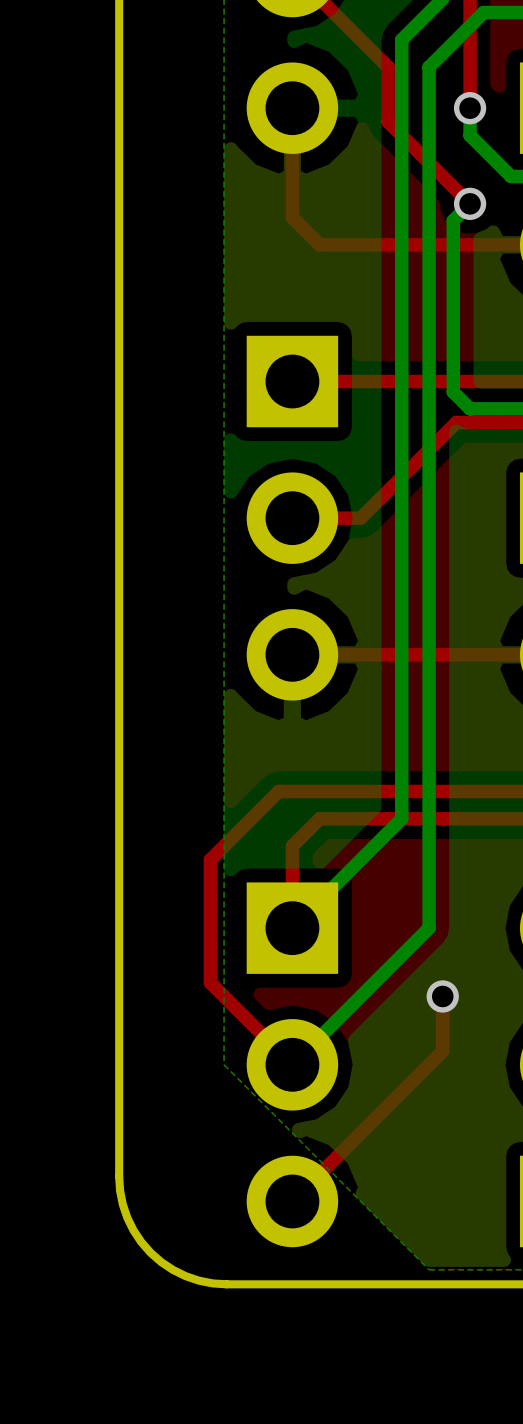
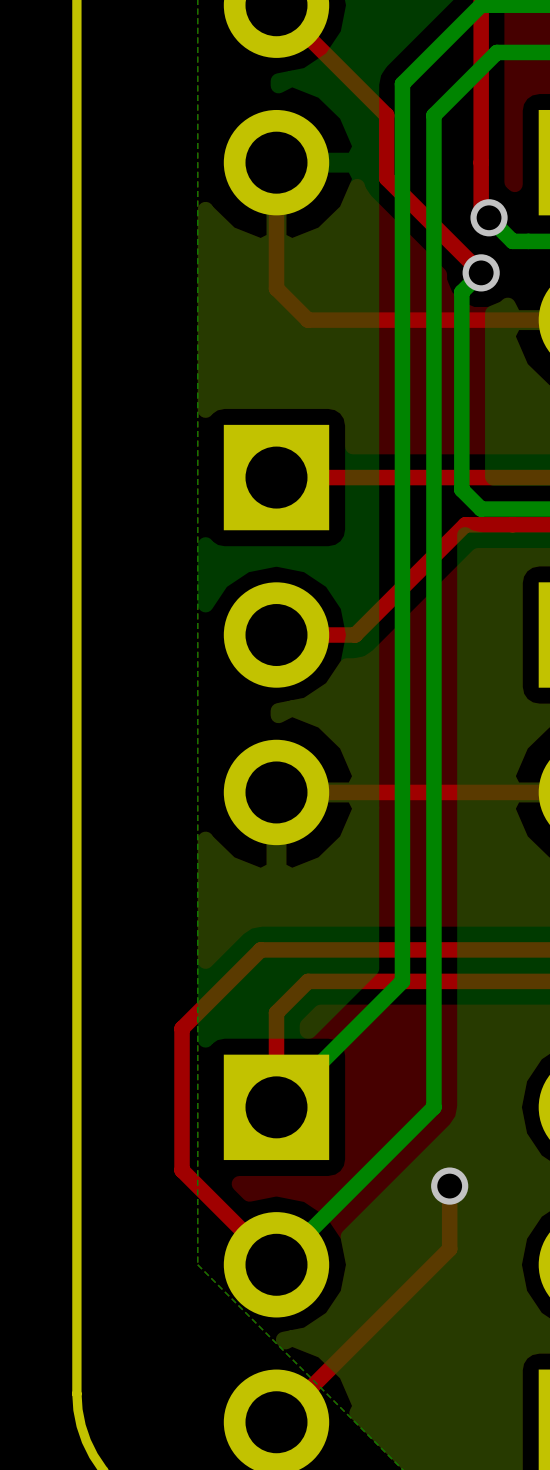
top track: none -> (481, 162) (481, 209) (489, 217)
bottom track: (470, 108) (470, 135) (511, 176) -> (489, 217) (512, 241) (528, 241)
via position: (470, 108) -> (489, 217)

